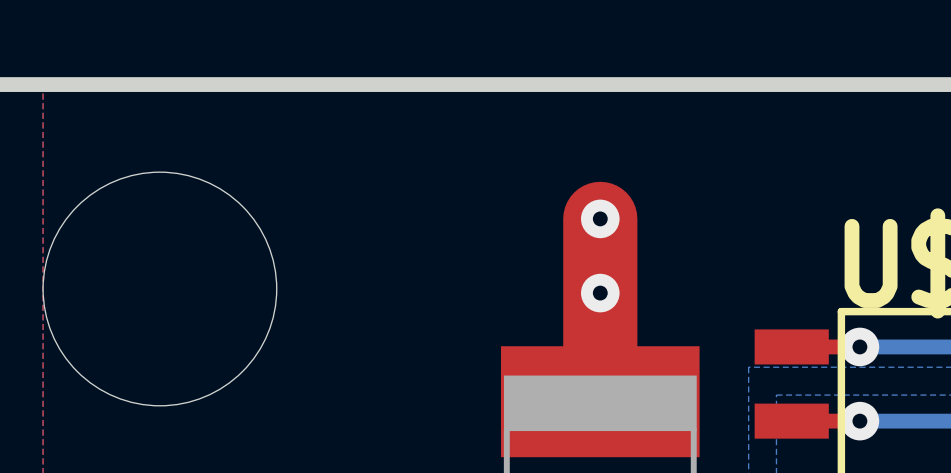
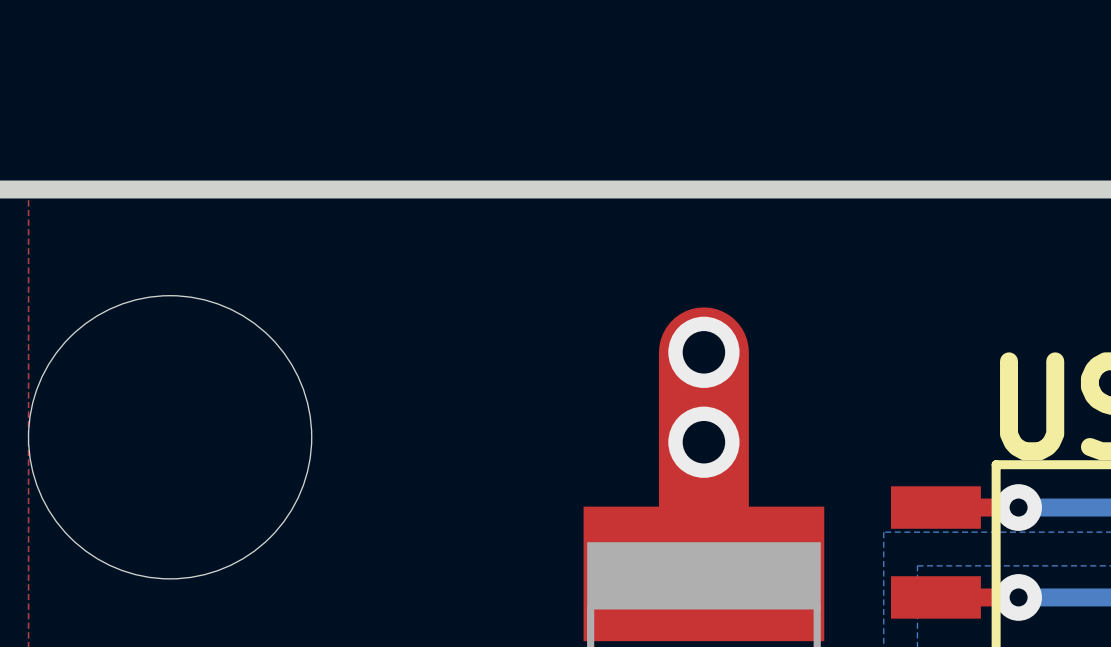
via size: [581, 199, 620, 239] -> [668, 316, 740, 388]
via size: [581, 273, 620, 313] -> [668, 406, 740, 478]

